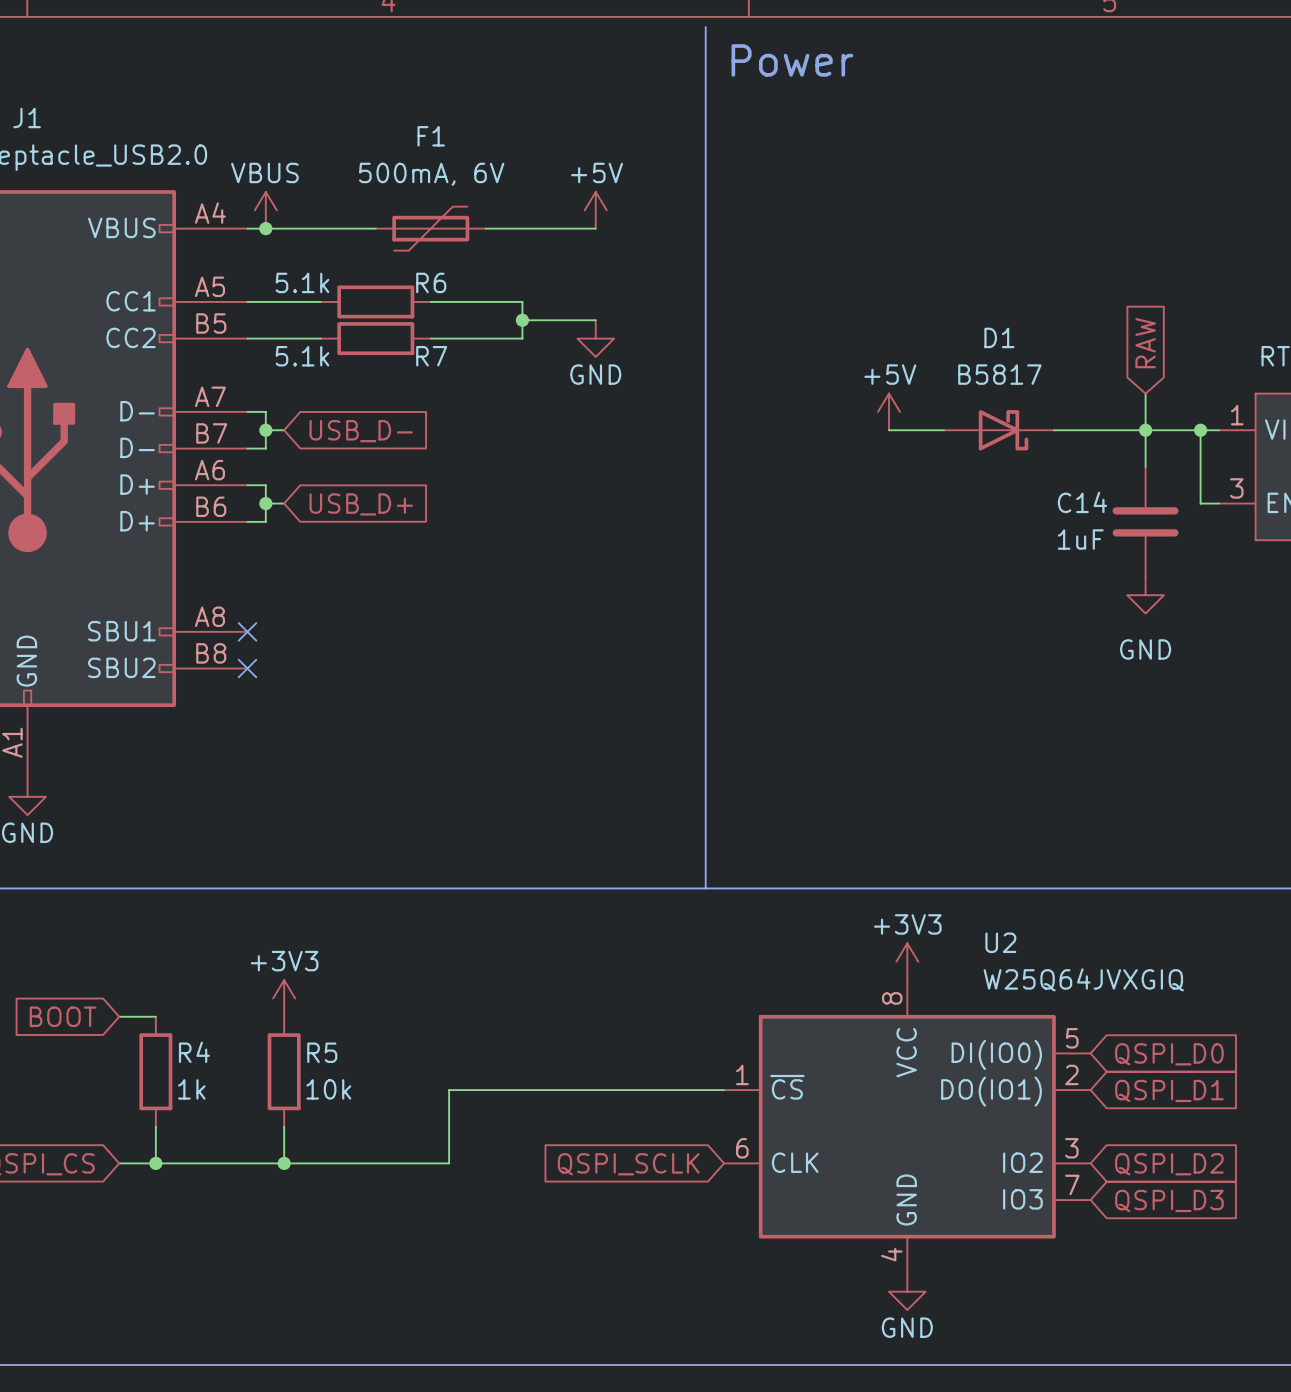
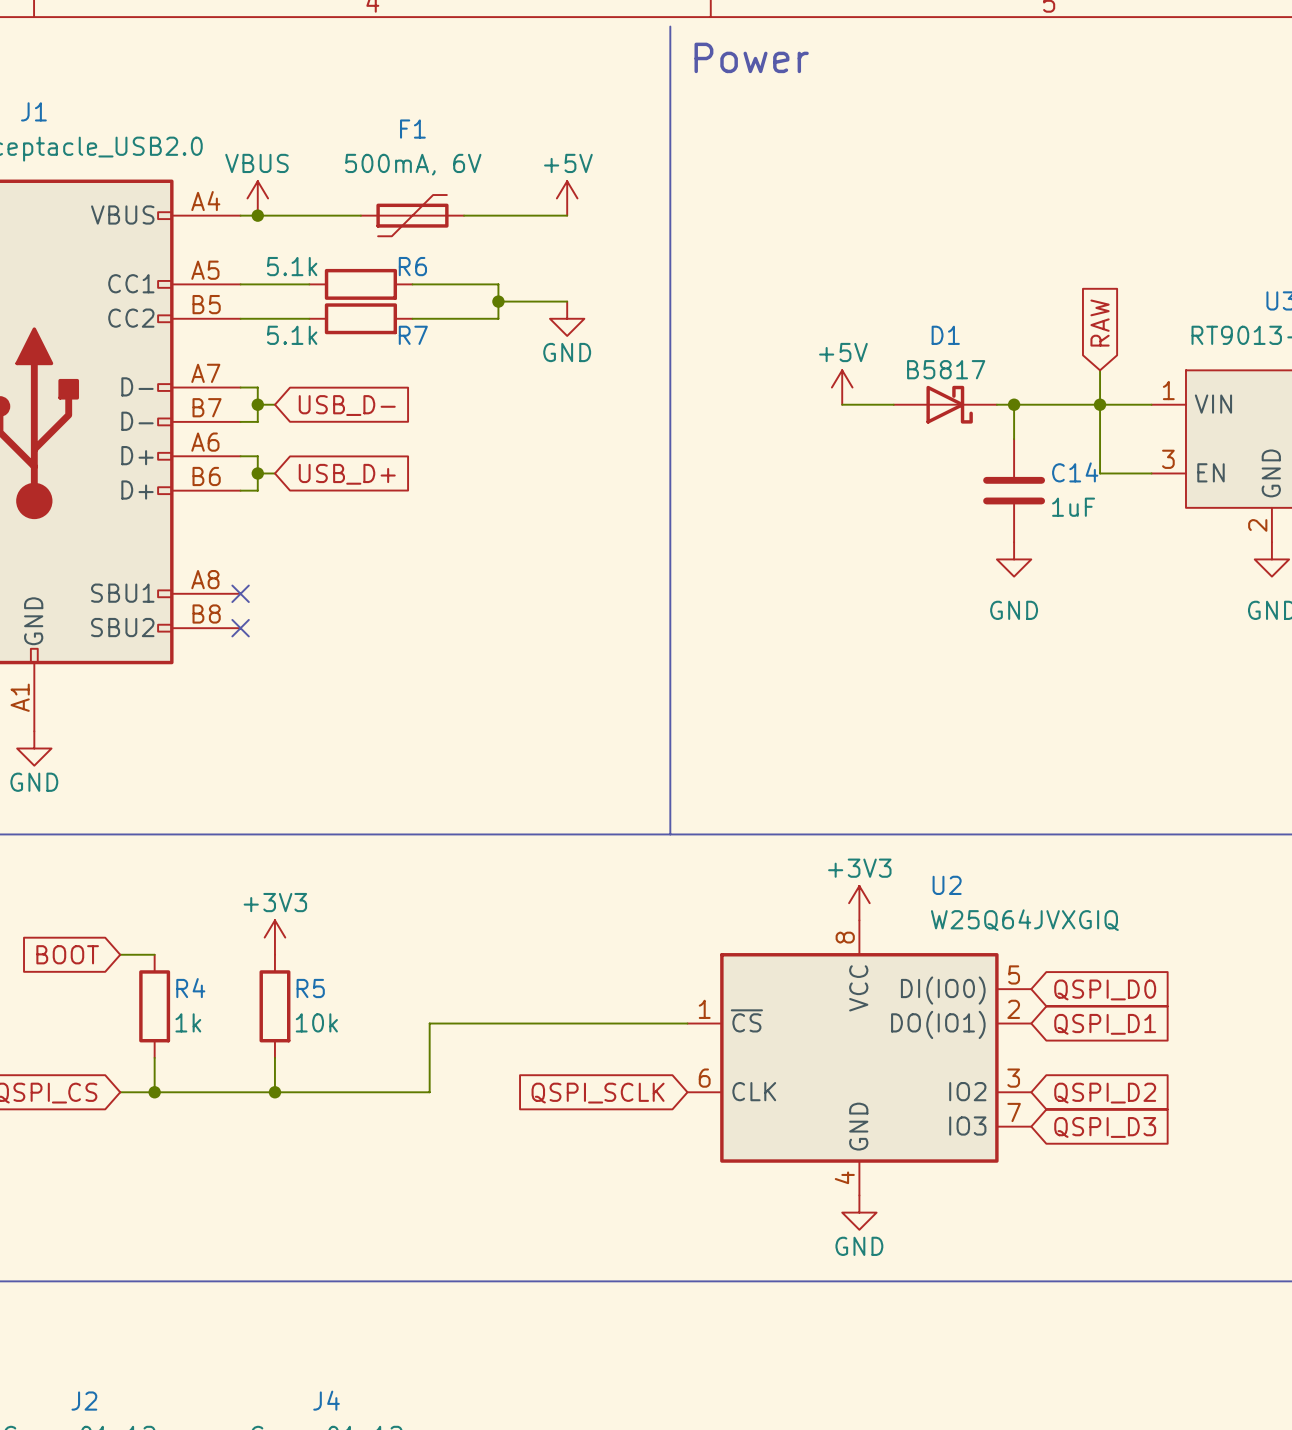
D1 name position: D1 (999, 337) -> D1 (945, 335)
global label position: RAW (1145, 343) -> RAW (1100, 323)
D1 value position: B5817 (999, 374) -> B5817 (946, 369)
wire: (1145, 393) (1145, 466) -> none
wire: none -> (1014, 404) (1014, 439)
junction: none -> (1014, 404)
junction: (1145, 430) -> none
junction: none -> (1100, 404)
wire: (1200, 430) (1200, 503) -> (1100, 370) (1100, 473) (1134, 473)
junction: (1200, 430) -> none
C14 name position: C14 (1082, 502) -> C14 (1075, 472)
C14 position: (1145, 521) -> (1014, 490)
C14 value position: 1uF (1080, 539) -> 1uF (1073, 507)
power symbol position: GND (1145, 595) -> GND (1014, 559)

